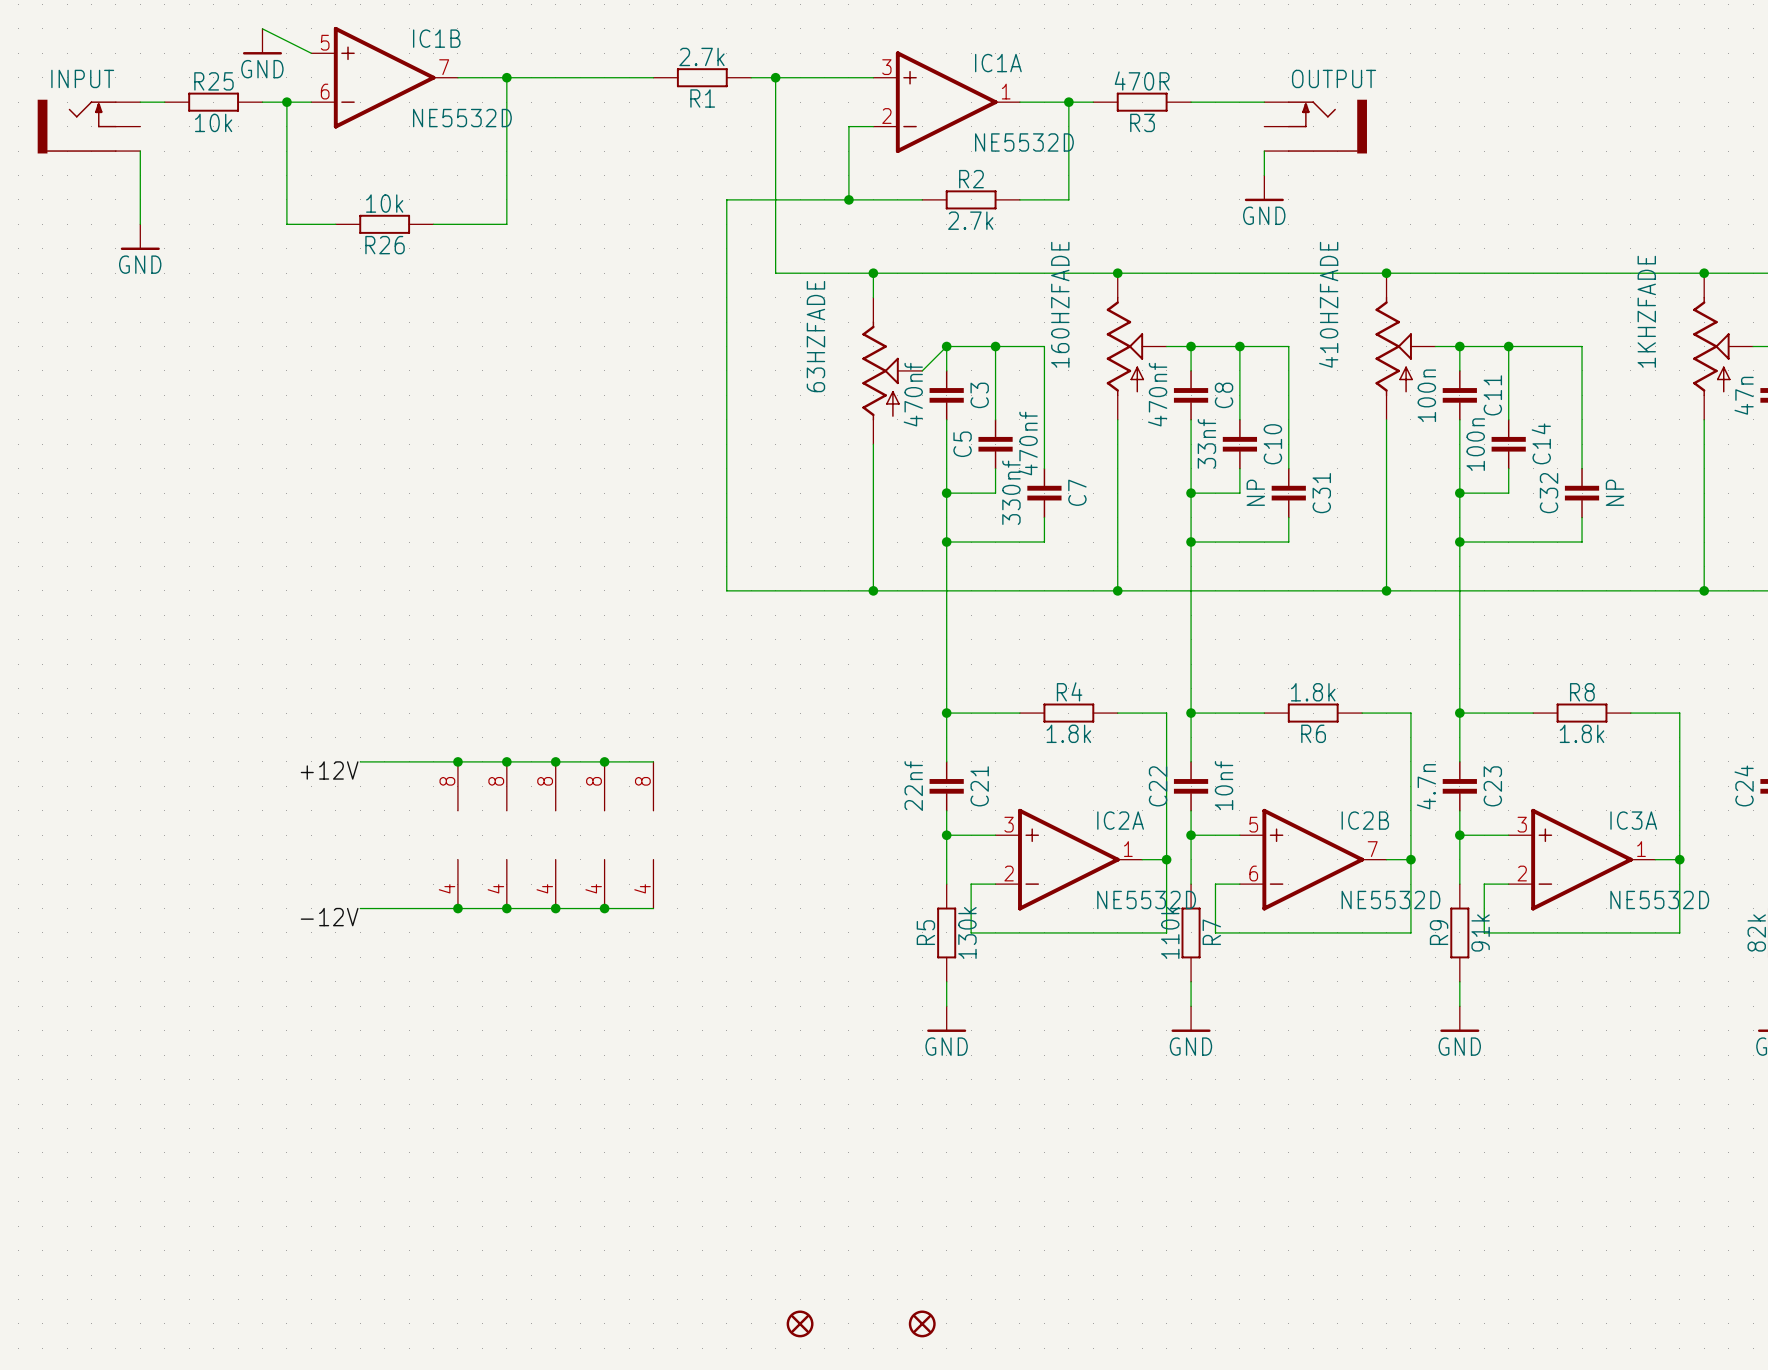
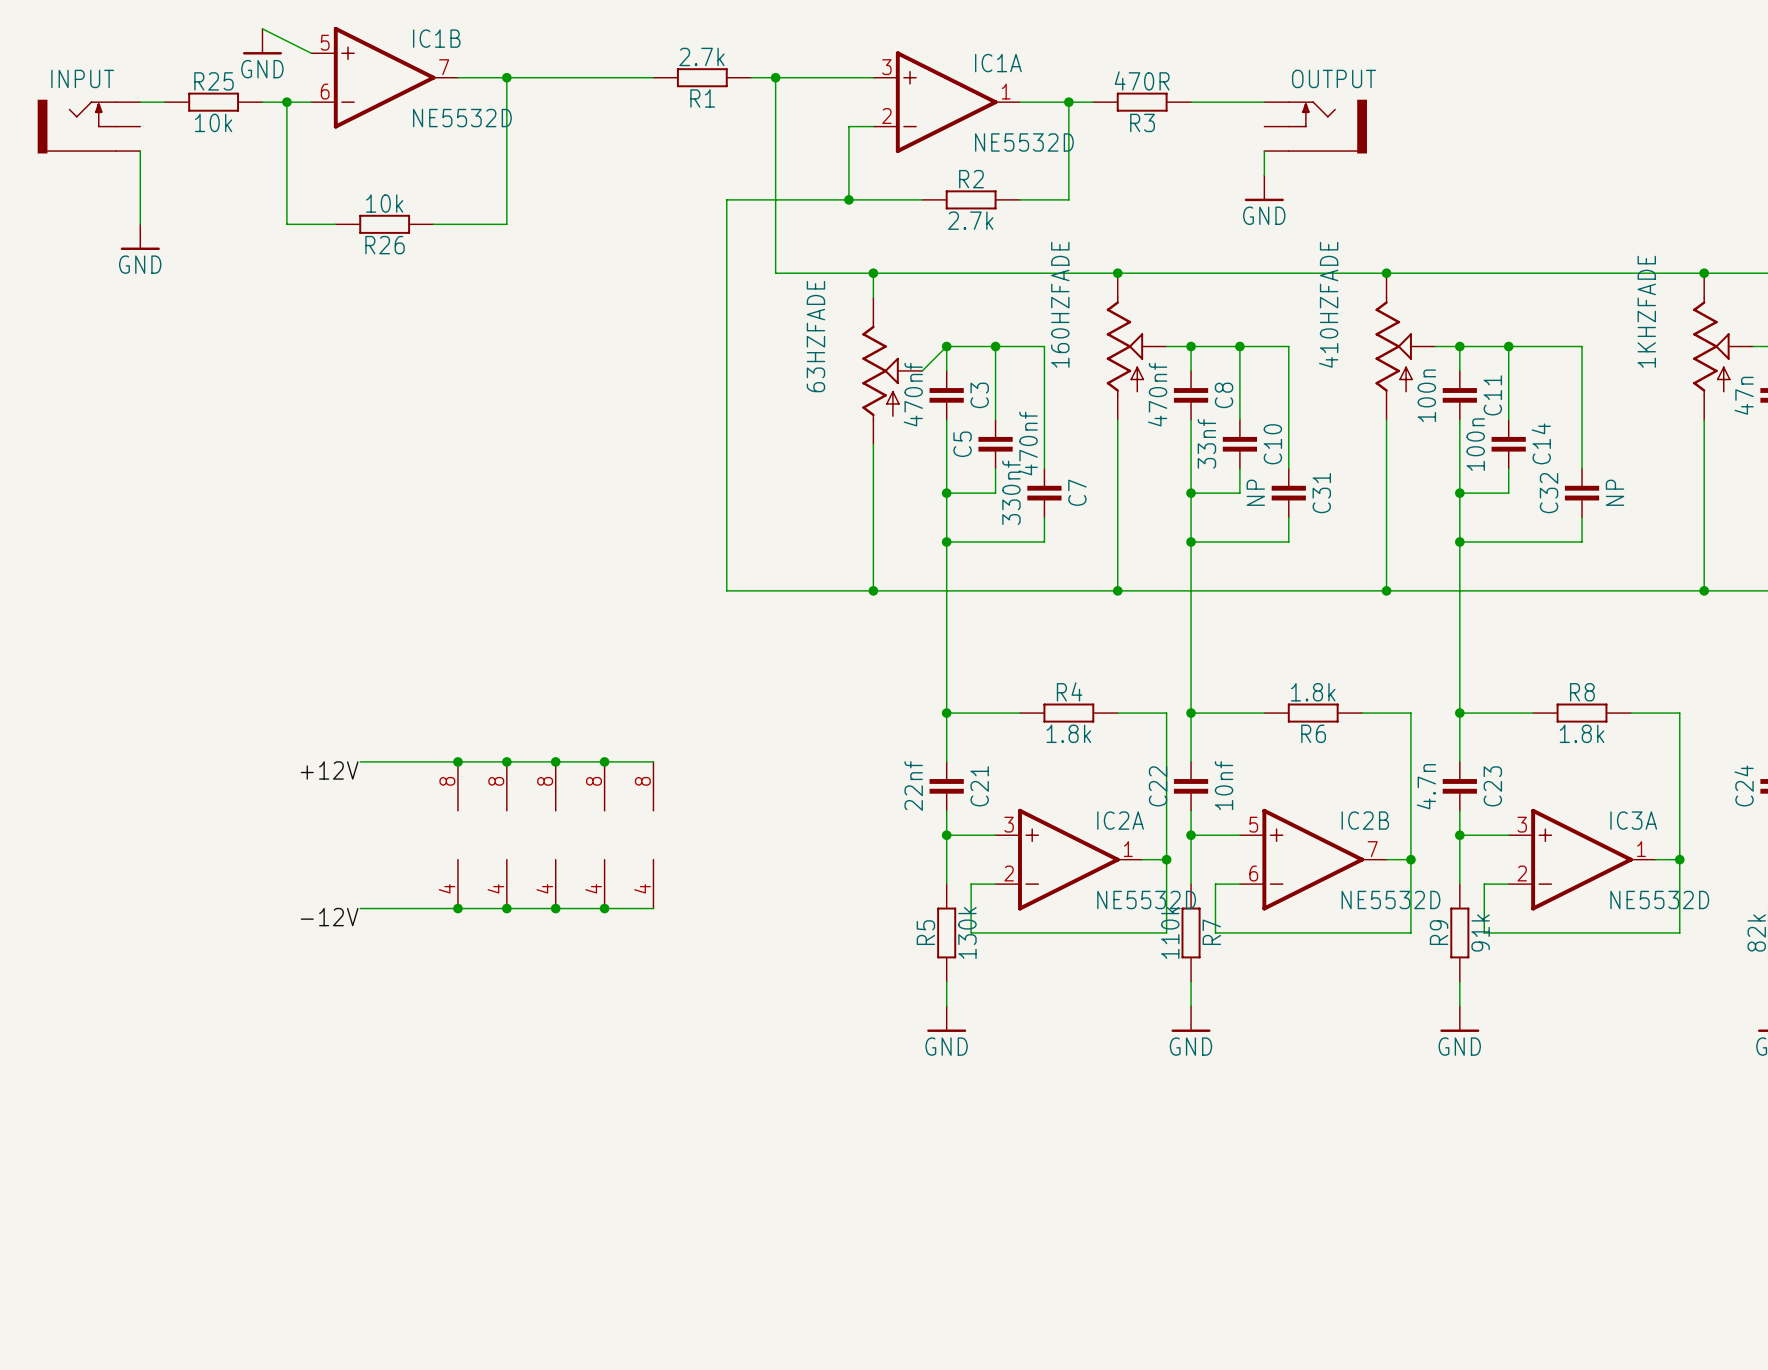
part: (800, 1323) -> none
part: (922, 1323) -> none

